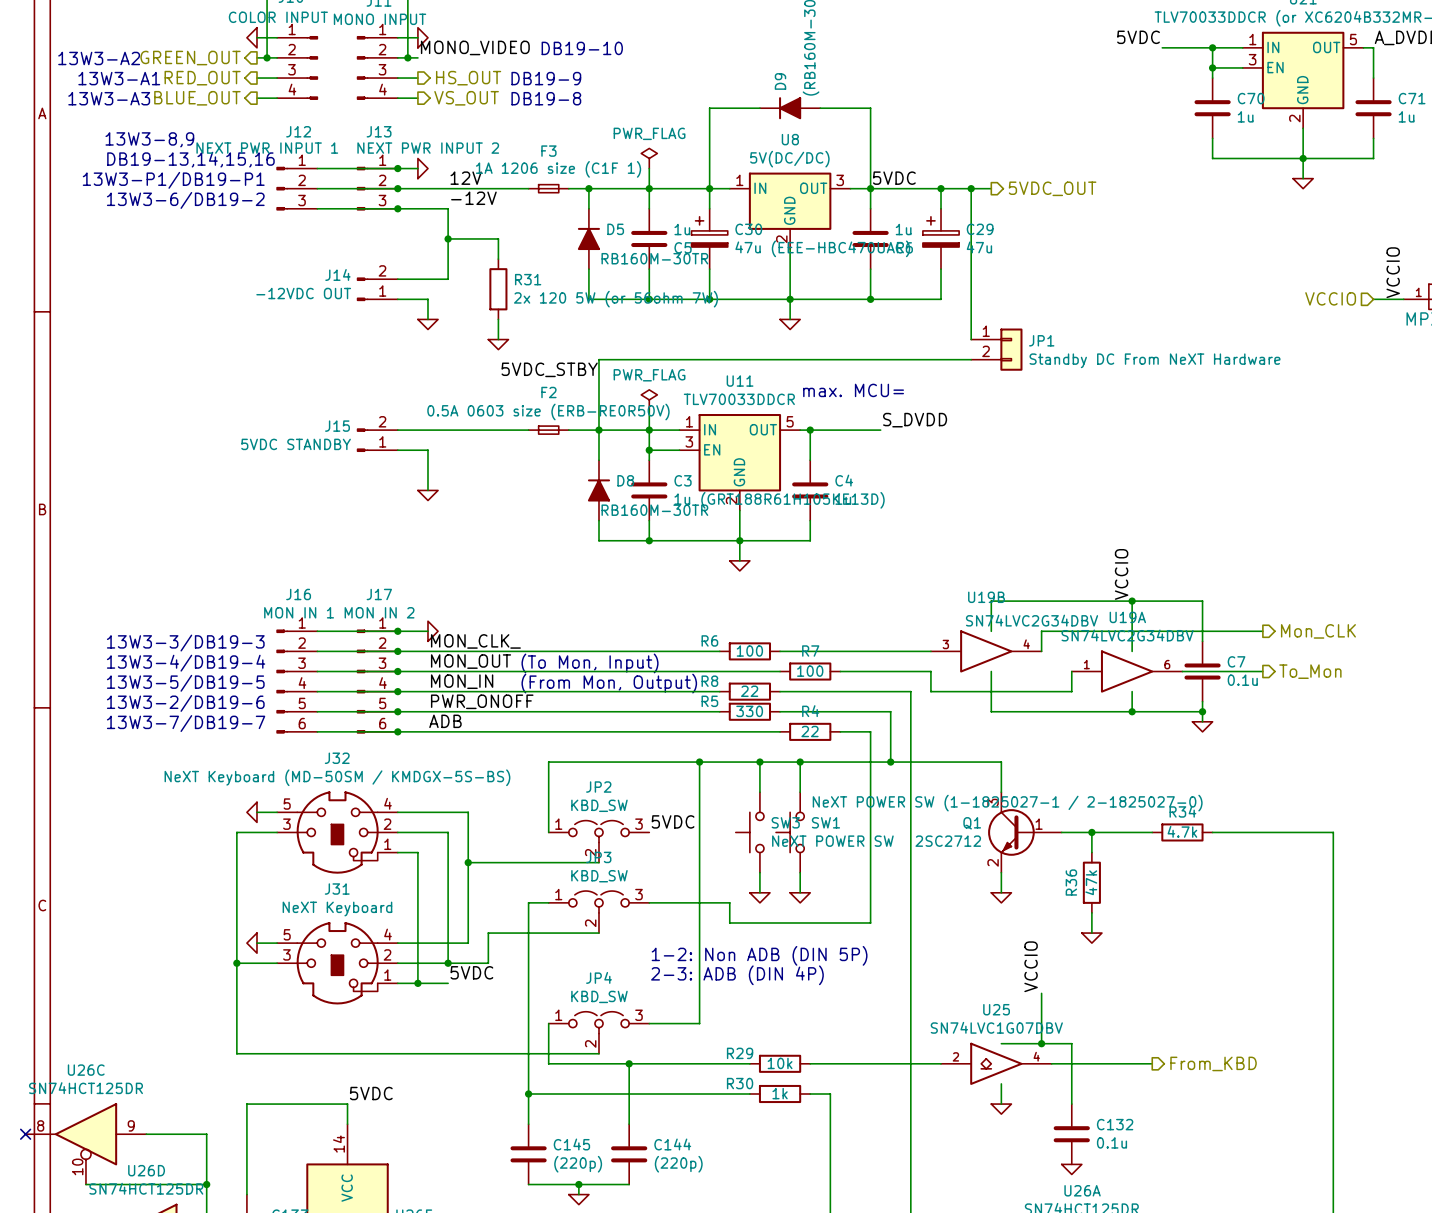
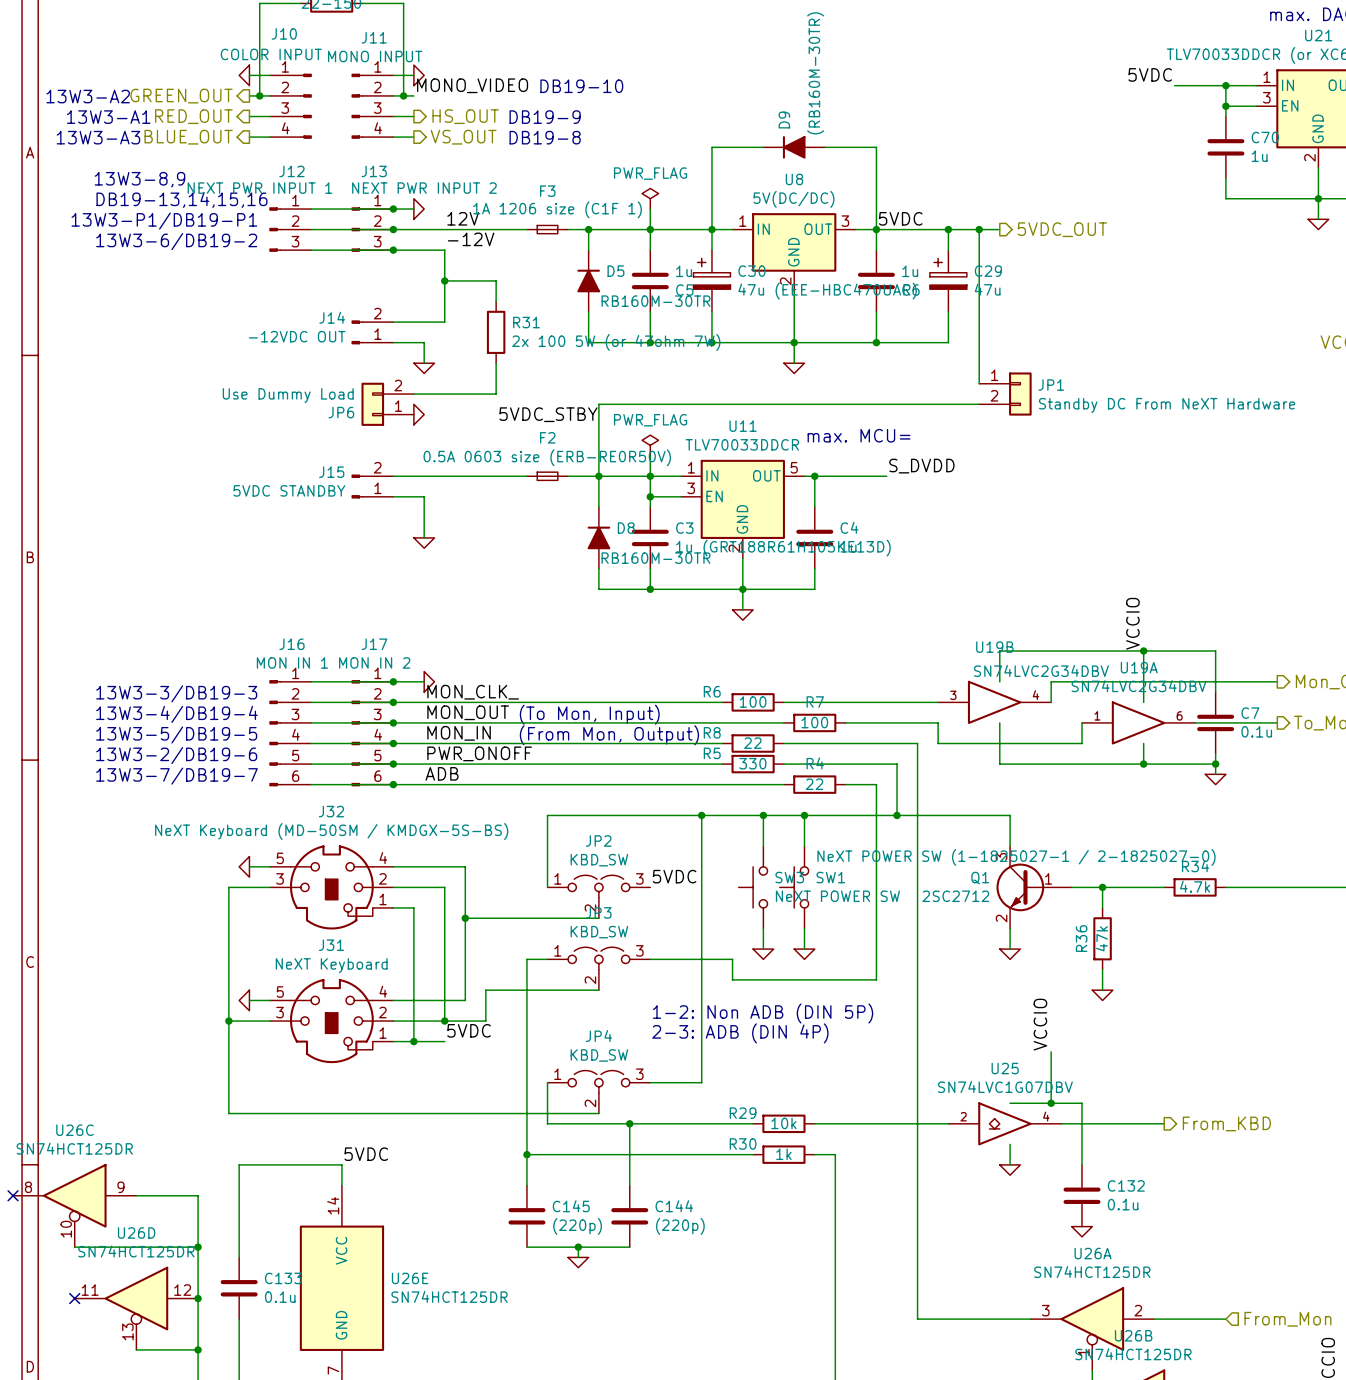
R31 value: 2x 120 5W (or 56ohm 7W) (616, 299) -> 2x 100 5W (or 47ohm 7W) (616, 342)
wire: none -> (496, 383) (496, 394) (413, 394)
power symbol rotation: 0° (498, 344) -> 90° counterclockwise (419, 414)
power symbol position: (498, 344) -> (419, 414)
JP6: none -> Use Dummy Load (387, 404)

